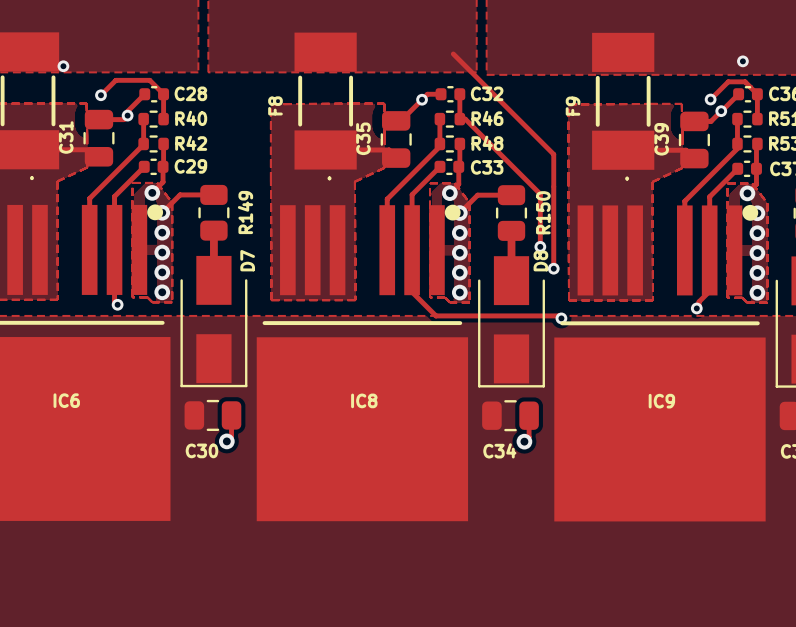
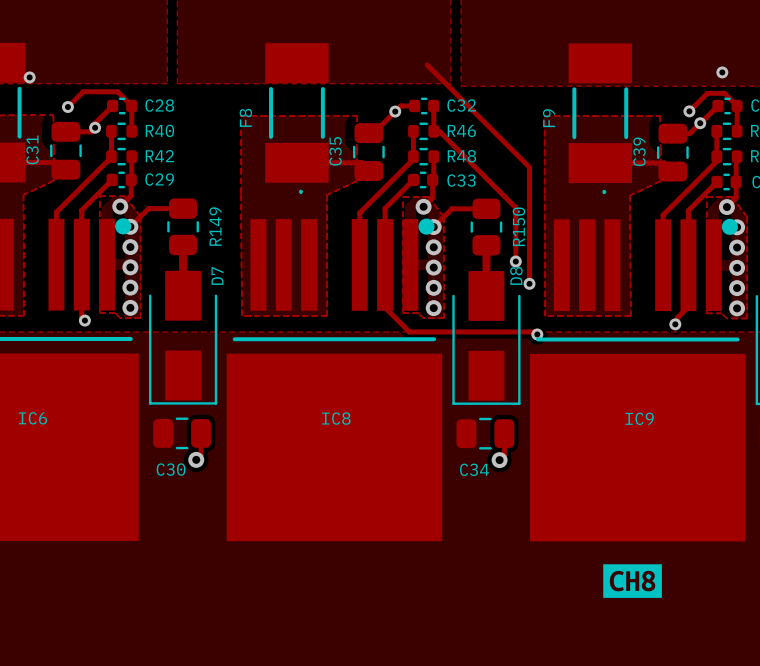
drawing: none -> [603, 564, 662, 598]

